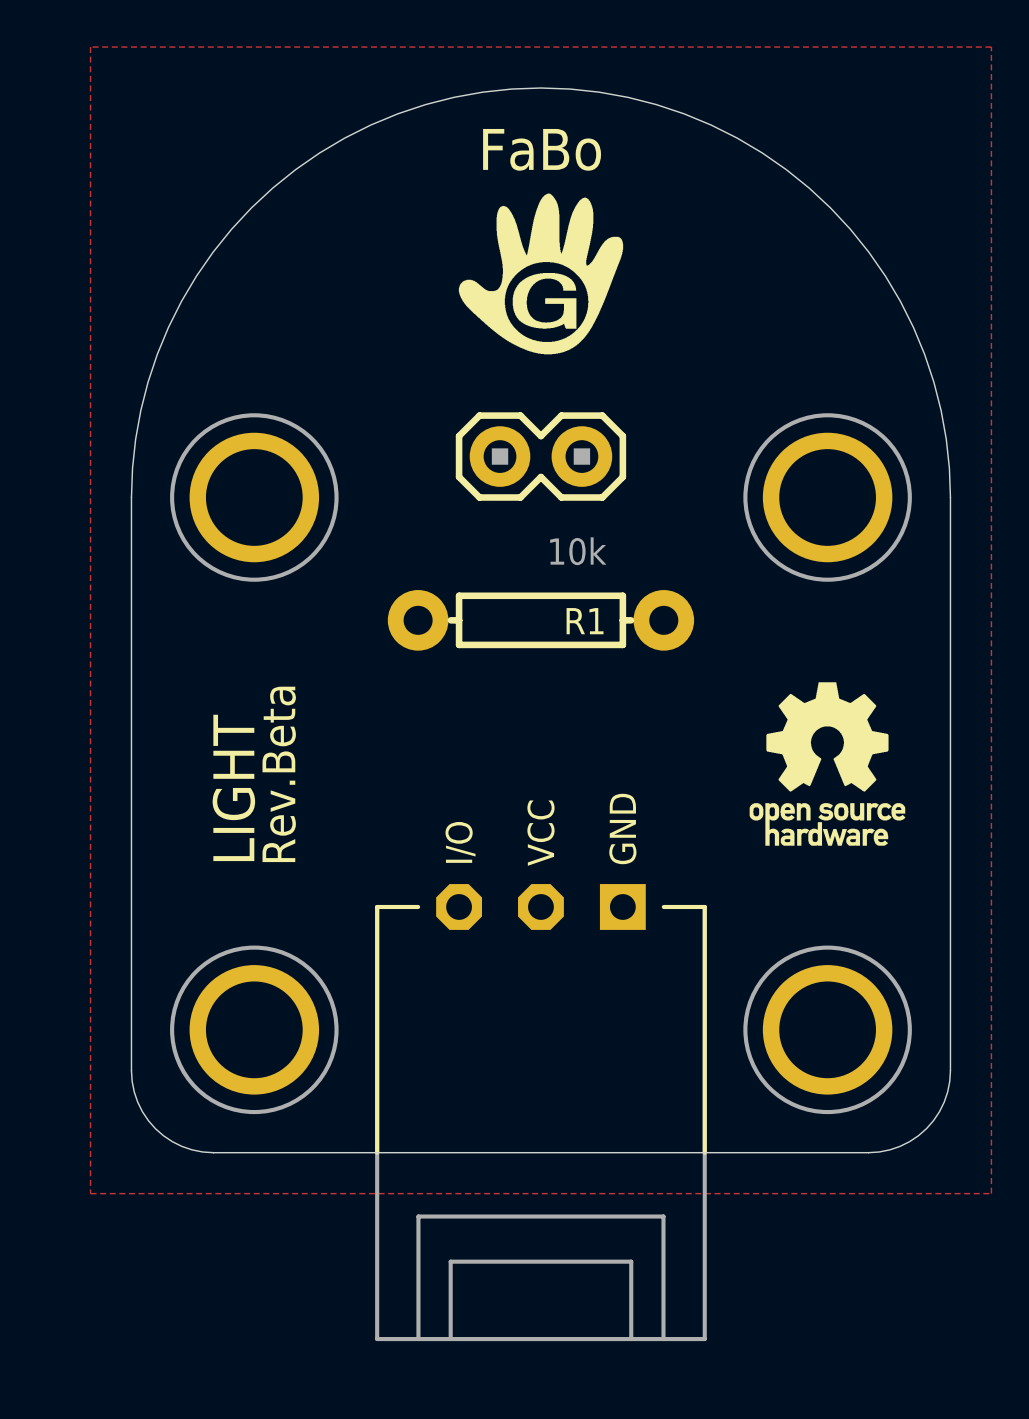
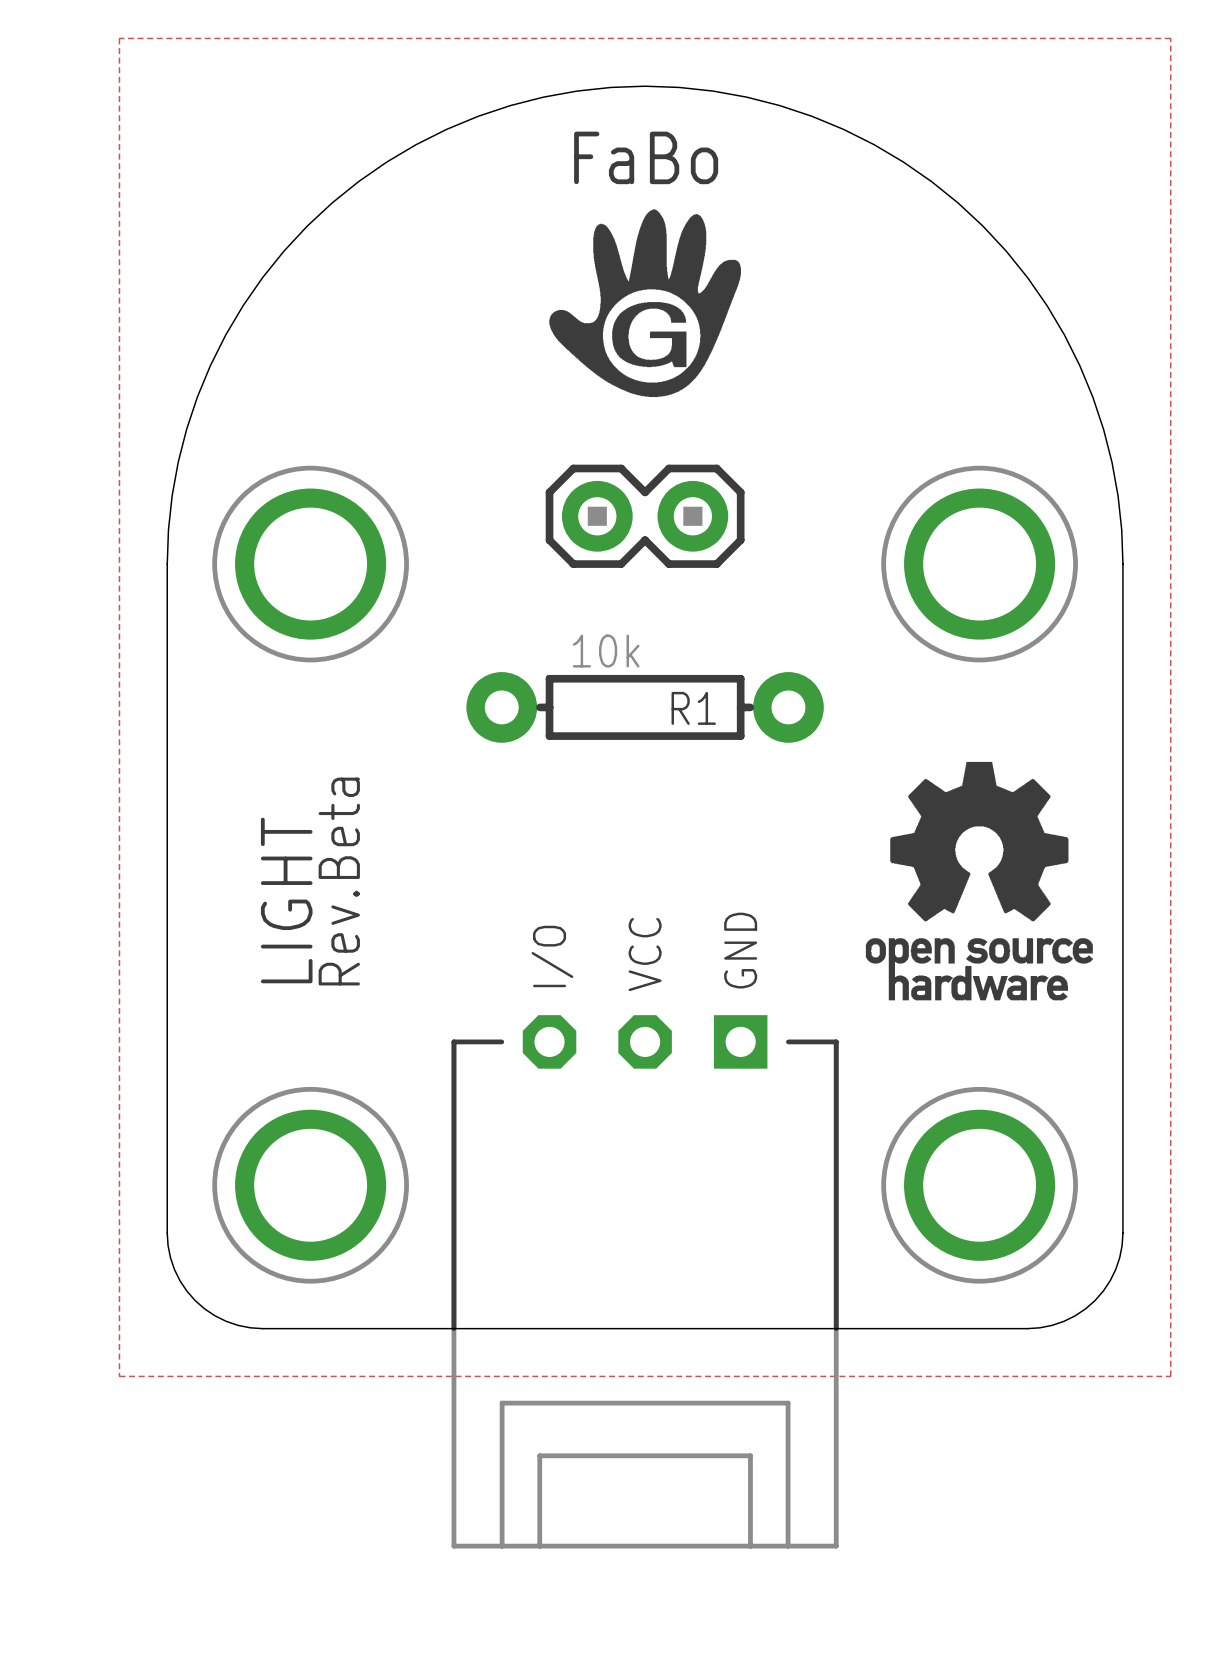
R1 value position: 10k (578, 551) -> 10k (606, 651)
drawing shape: [749, 682, 906, 846] -> [865, 761, 1093, 1001]

